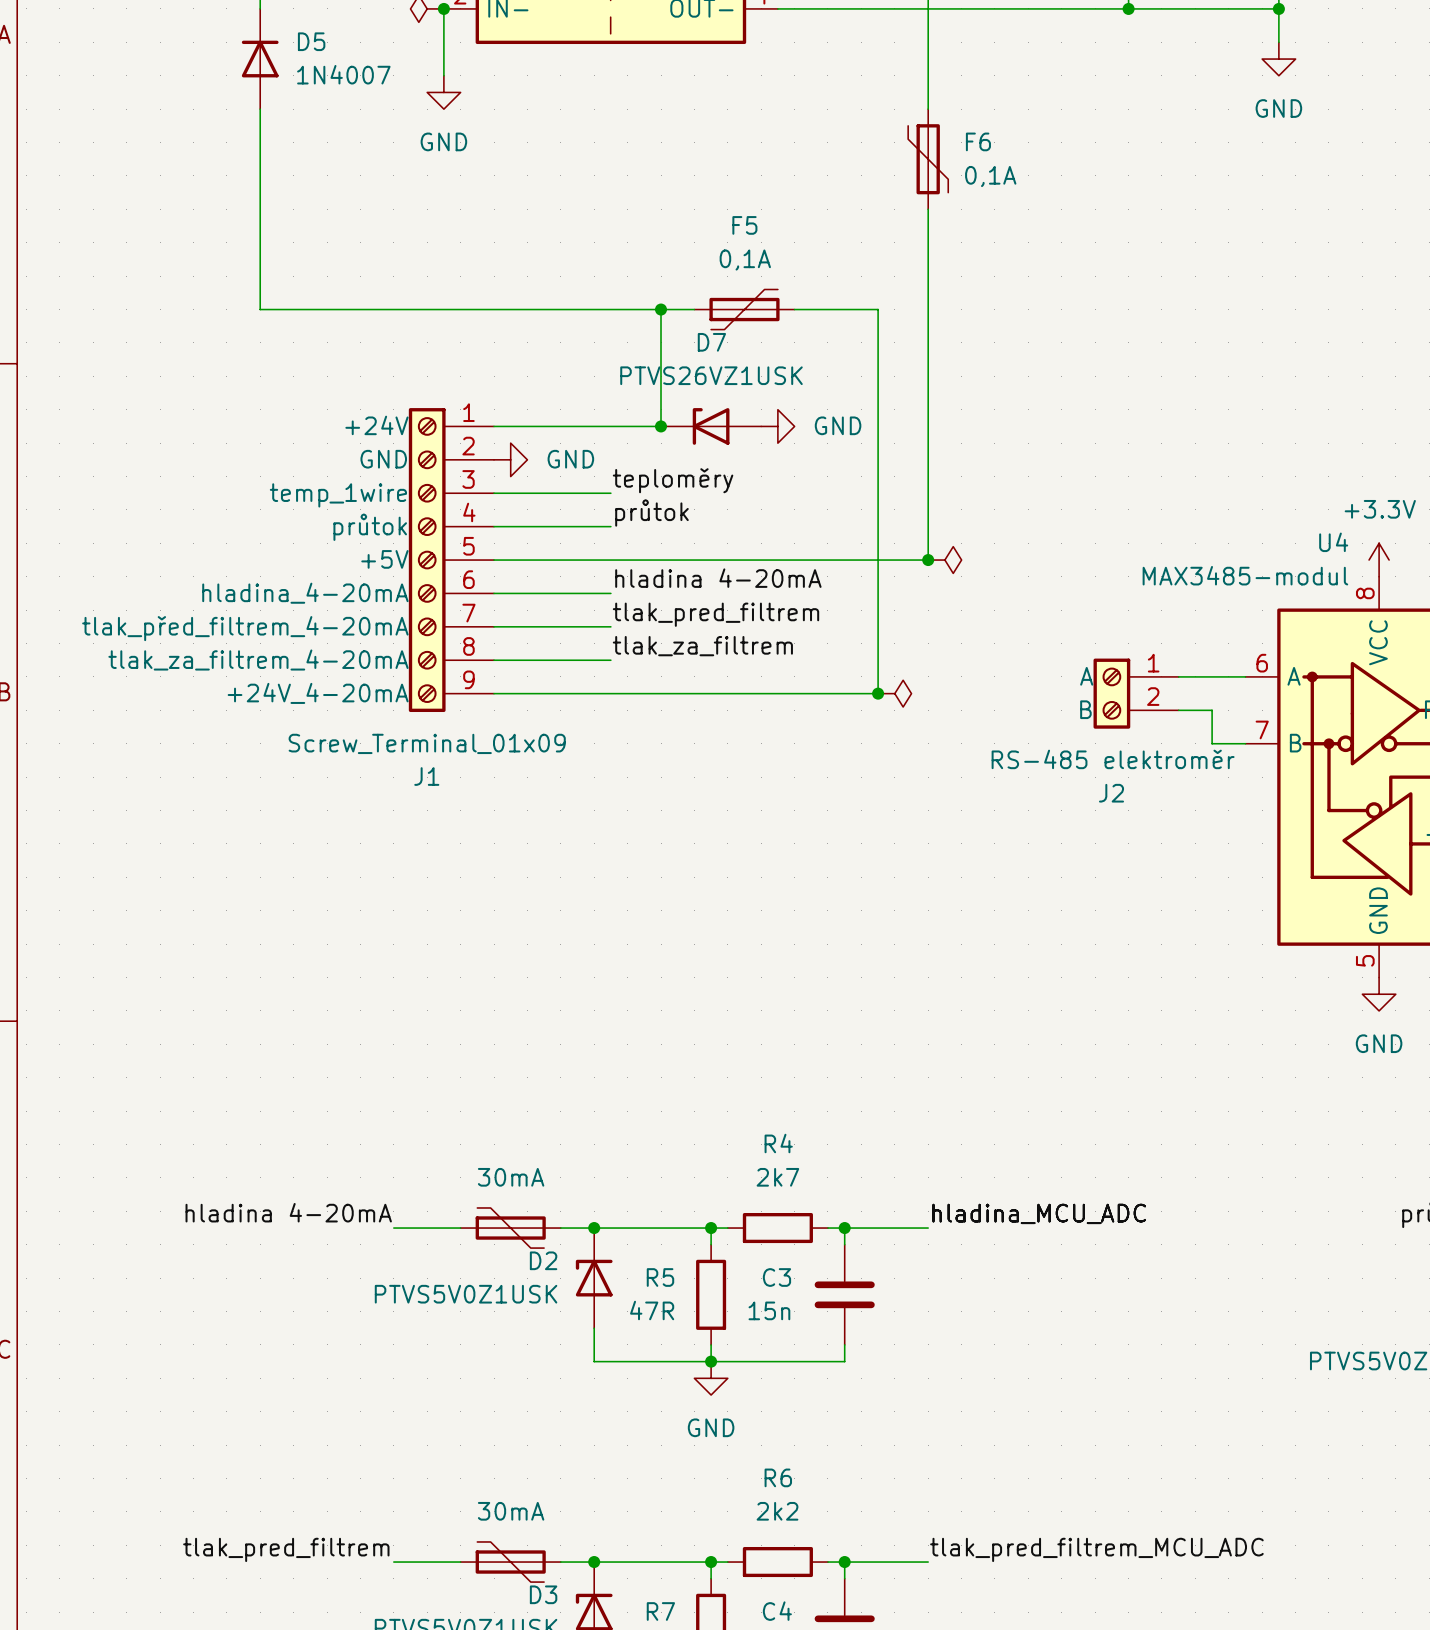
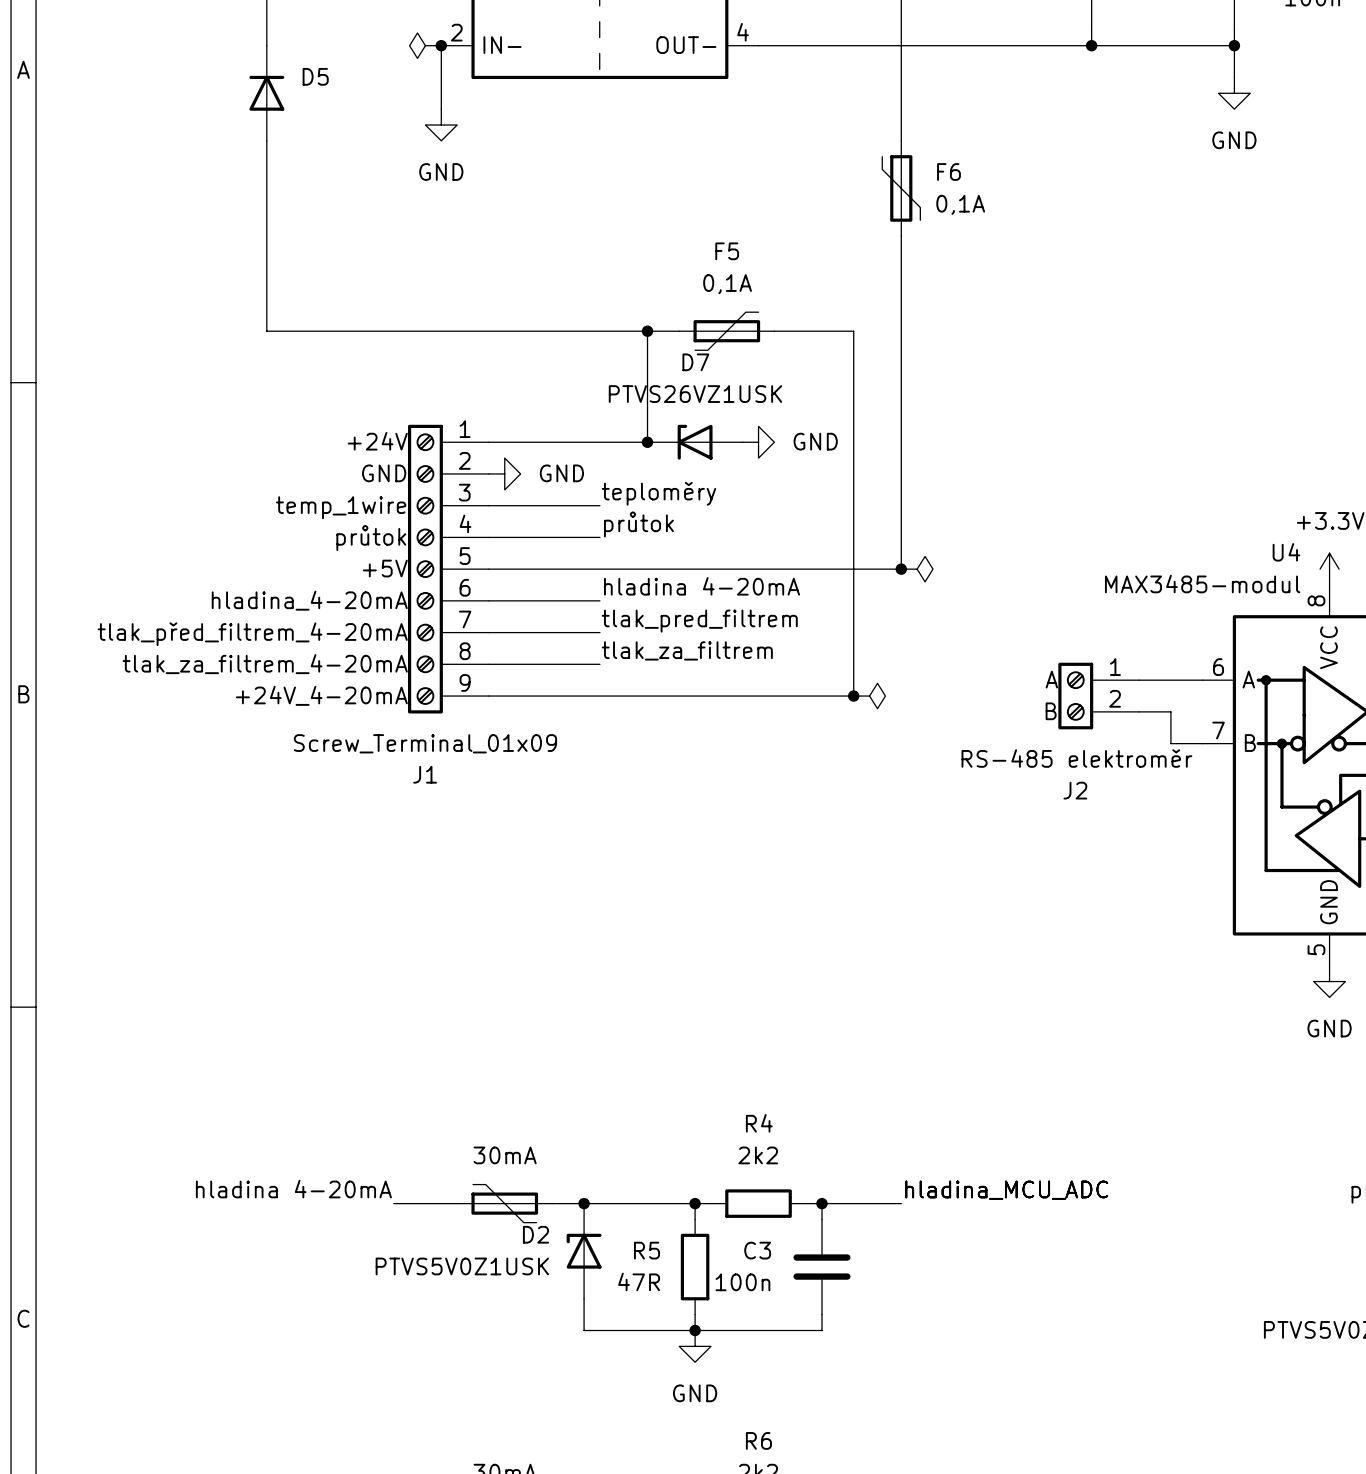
D5 value: 1N4007 (343, 74) -> none
R4 value: 2k7 (777, 1177) -> 2k2 (758, 1155)
C3 value: 15n (769, 1310) -> 100n (742, 1282)

